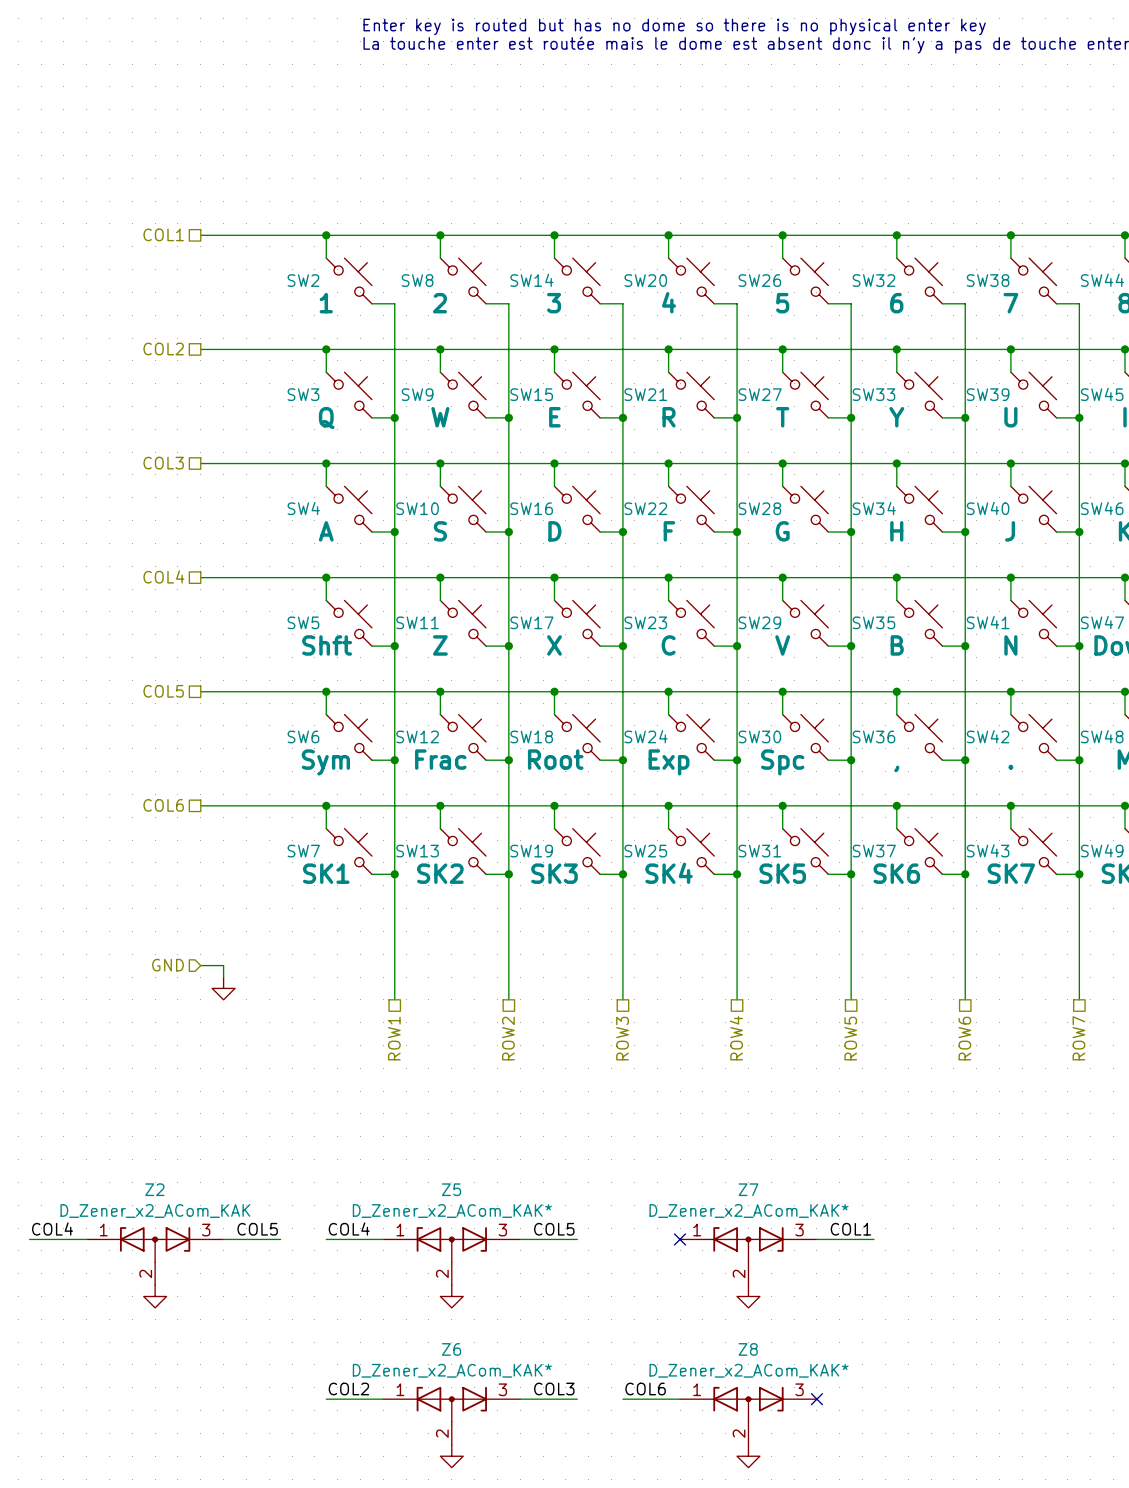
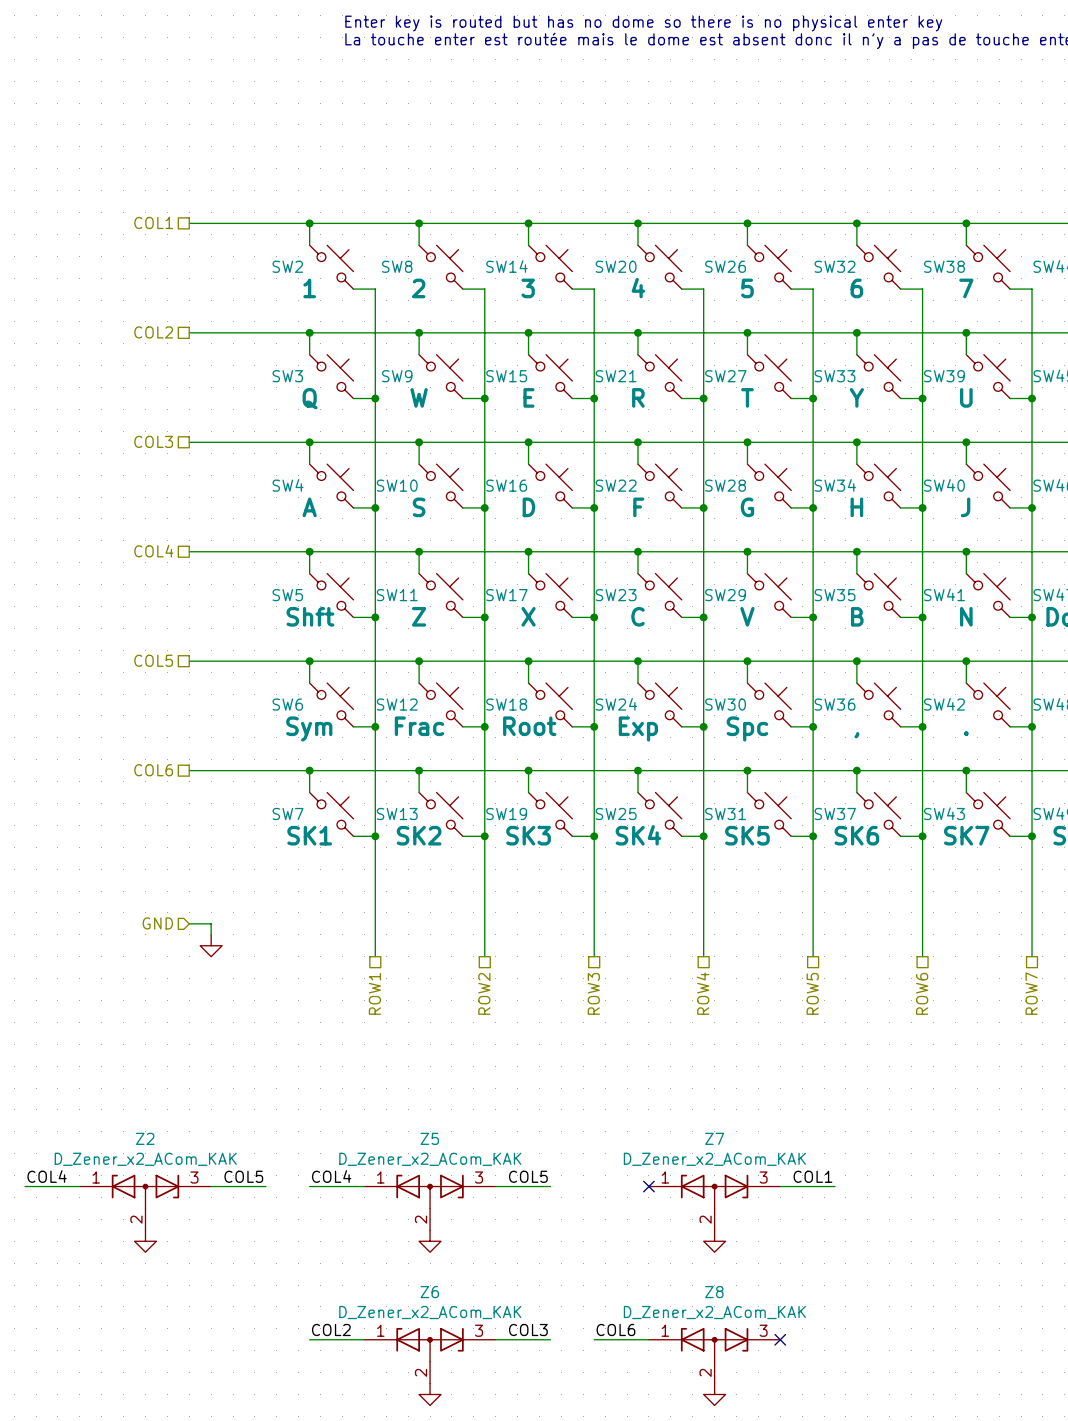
Z5 value: D_Zener_x2_ACom_KAK* (452, 1211) -> D_Zener_x2_ACom_KAK (430, 1159)
Z7 value: D_Zener_x2_ACom_KAK* (749, 1211) -> D_Zener_x2_ACom_KAK (714, 1159)
Z6 value: D_Zener_x2_ACom_KAK* (452, 1370) -> D_Zener_x2_ACom_KAK (430, 1312)
Z8 value: D_Zener_x2_ACom_KAK* (749, 1370) -> D_Zener_x2_ACom_KAK (714, 1312)

